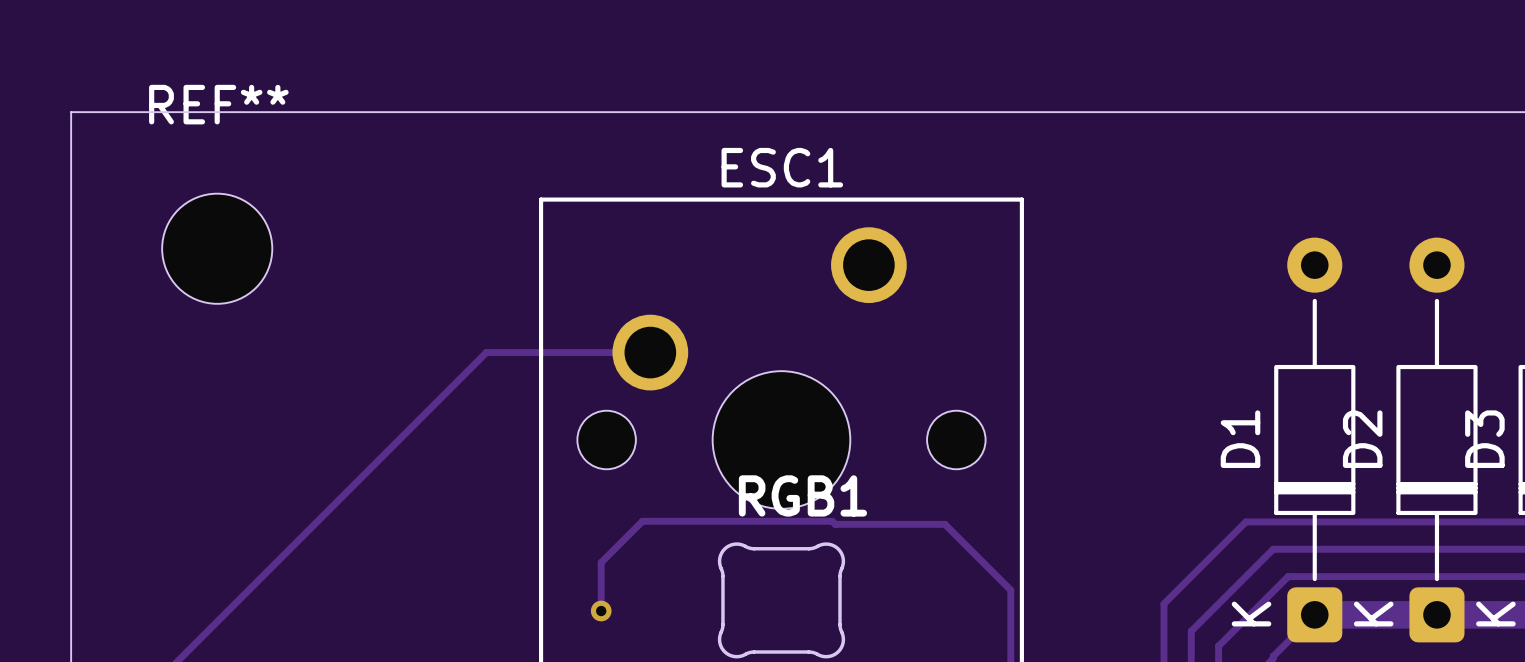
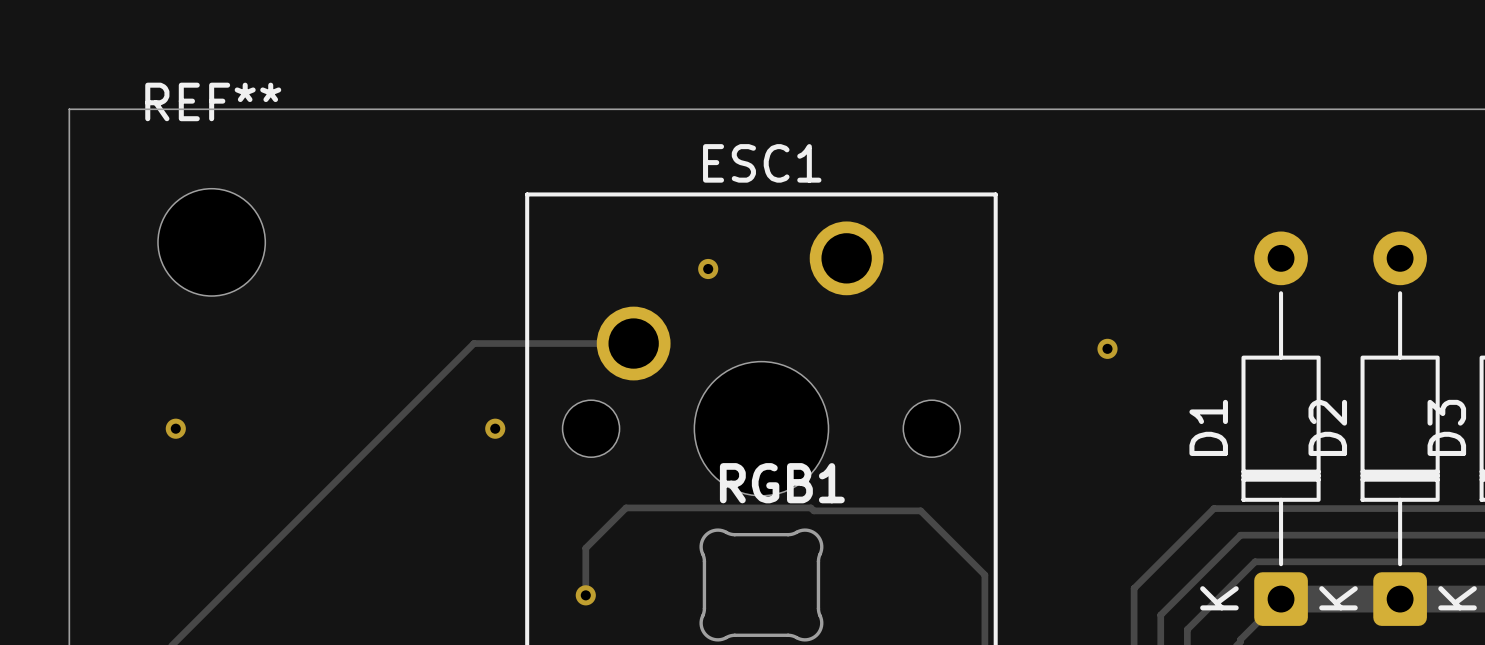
via: none -> (708, 268)
via: none -> (1107, 348)
via: none -> (175, 428)
via: none -> (495, 428)

